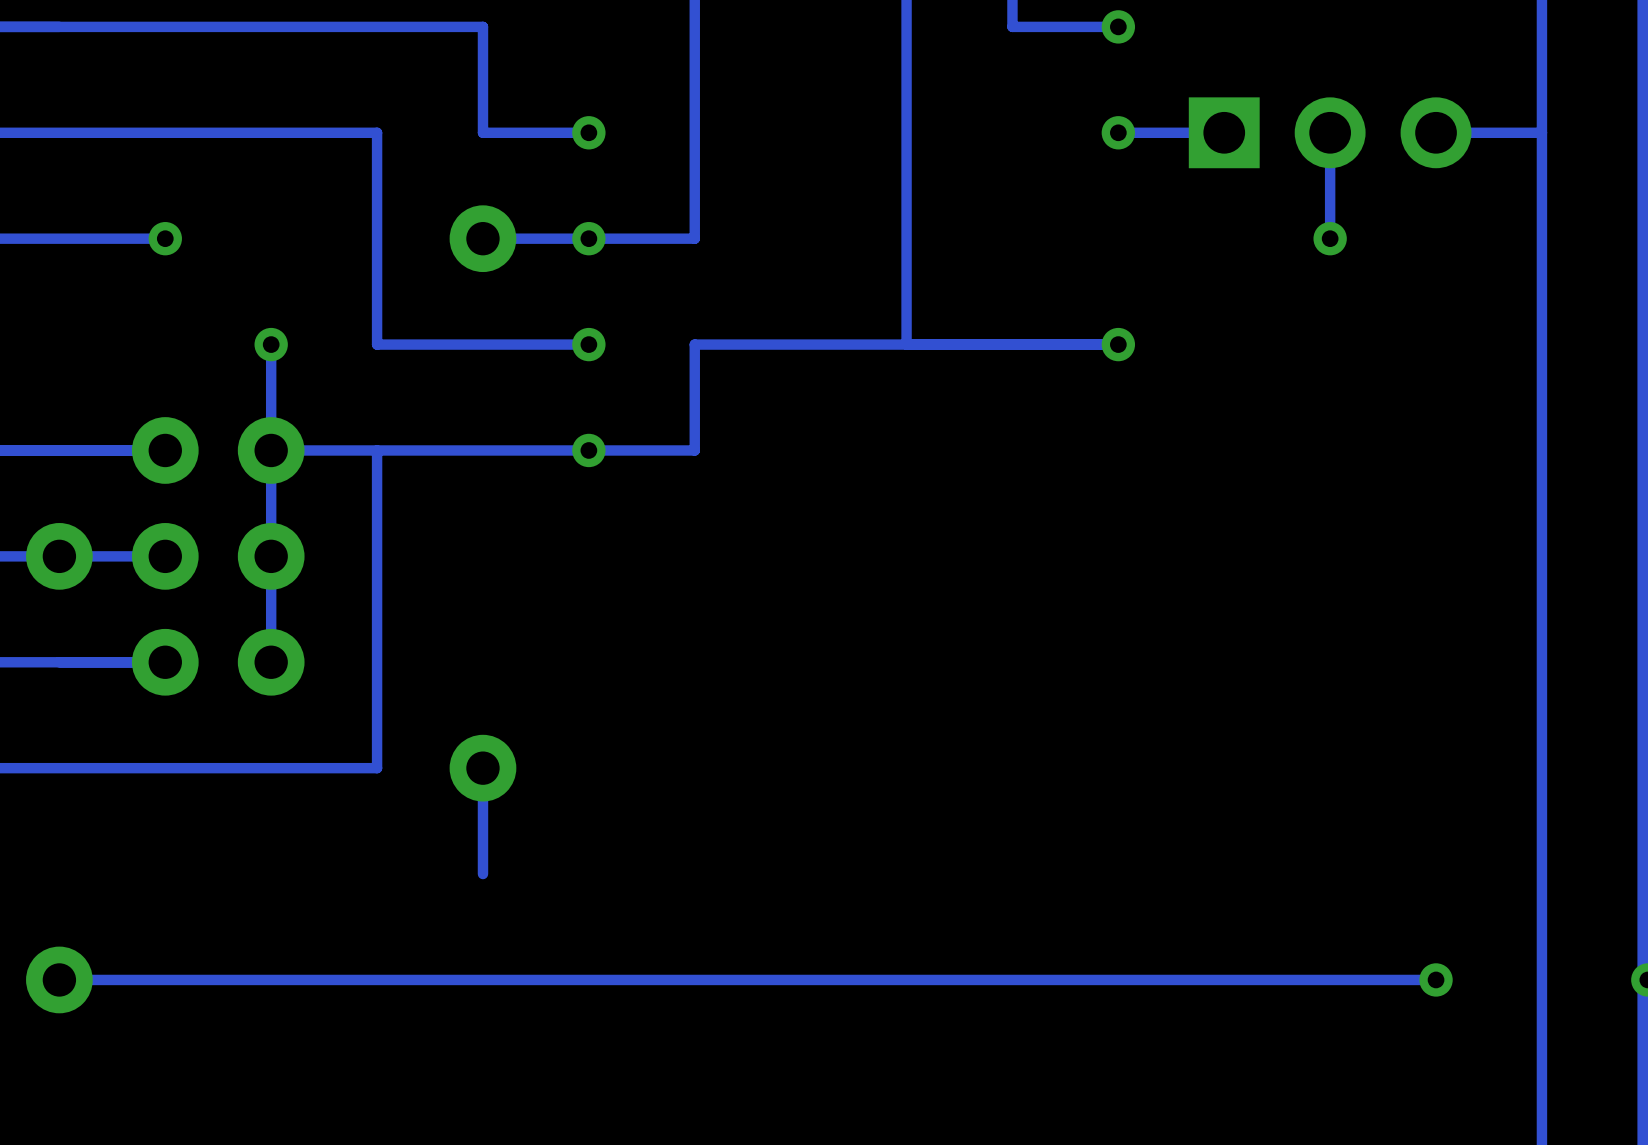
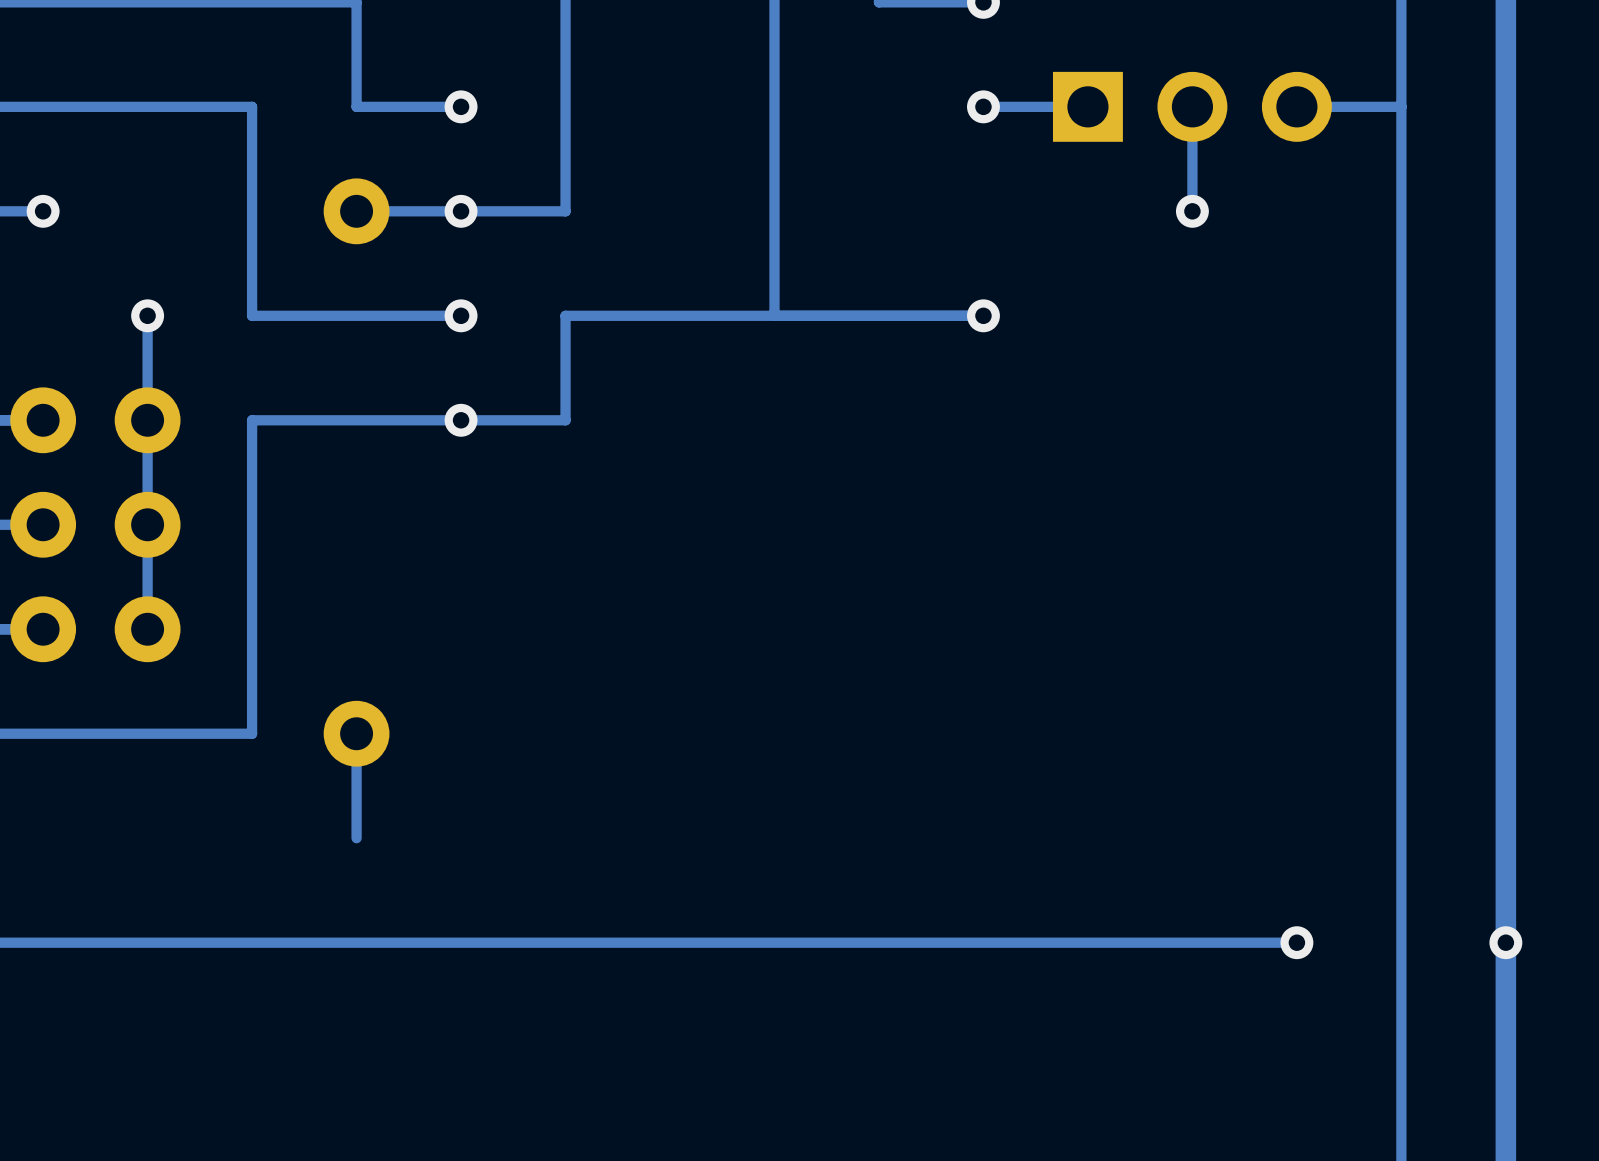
track: (377, 450) (271, 450) -> none

